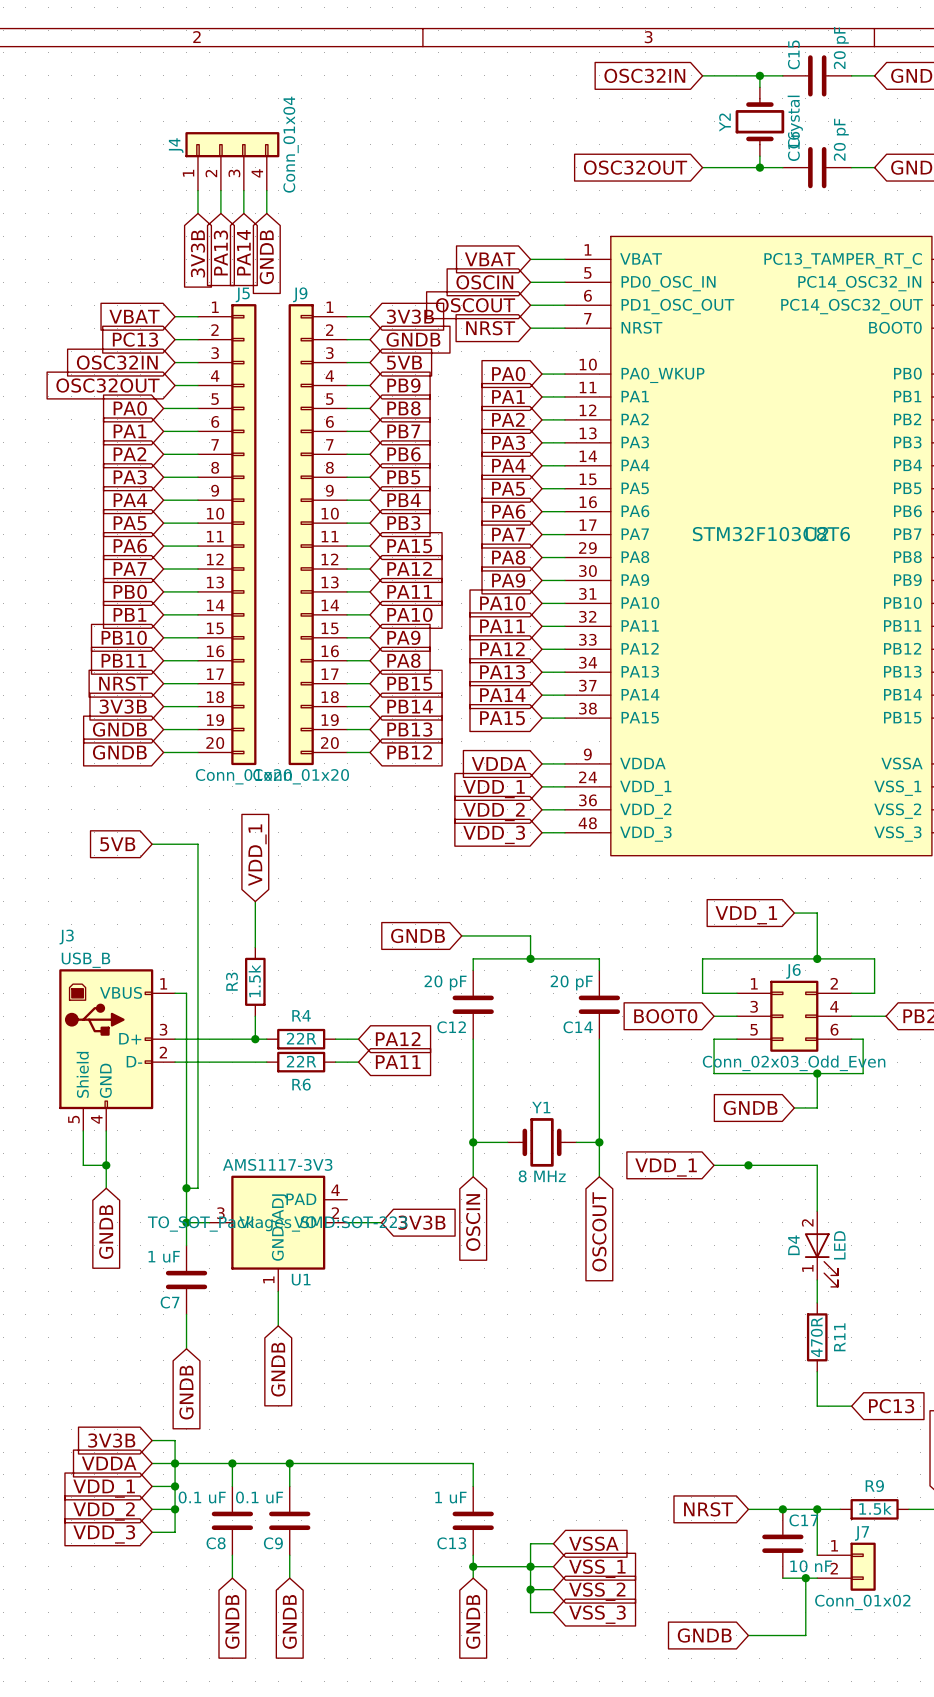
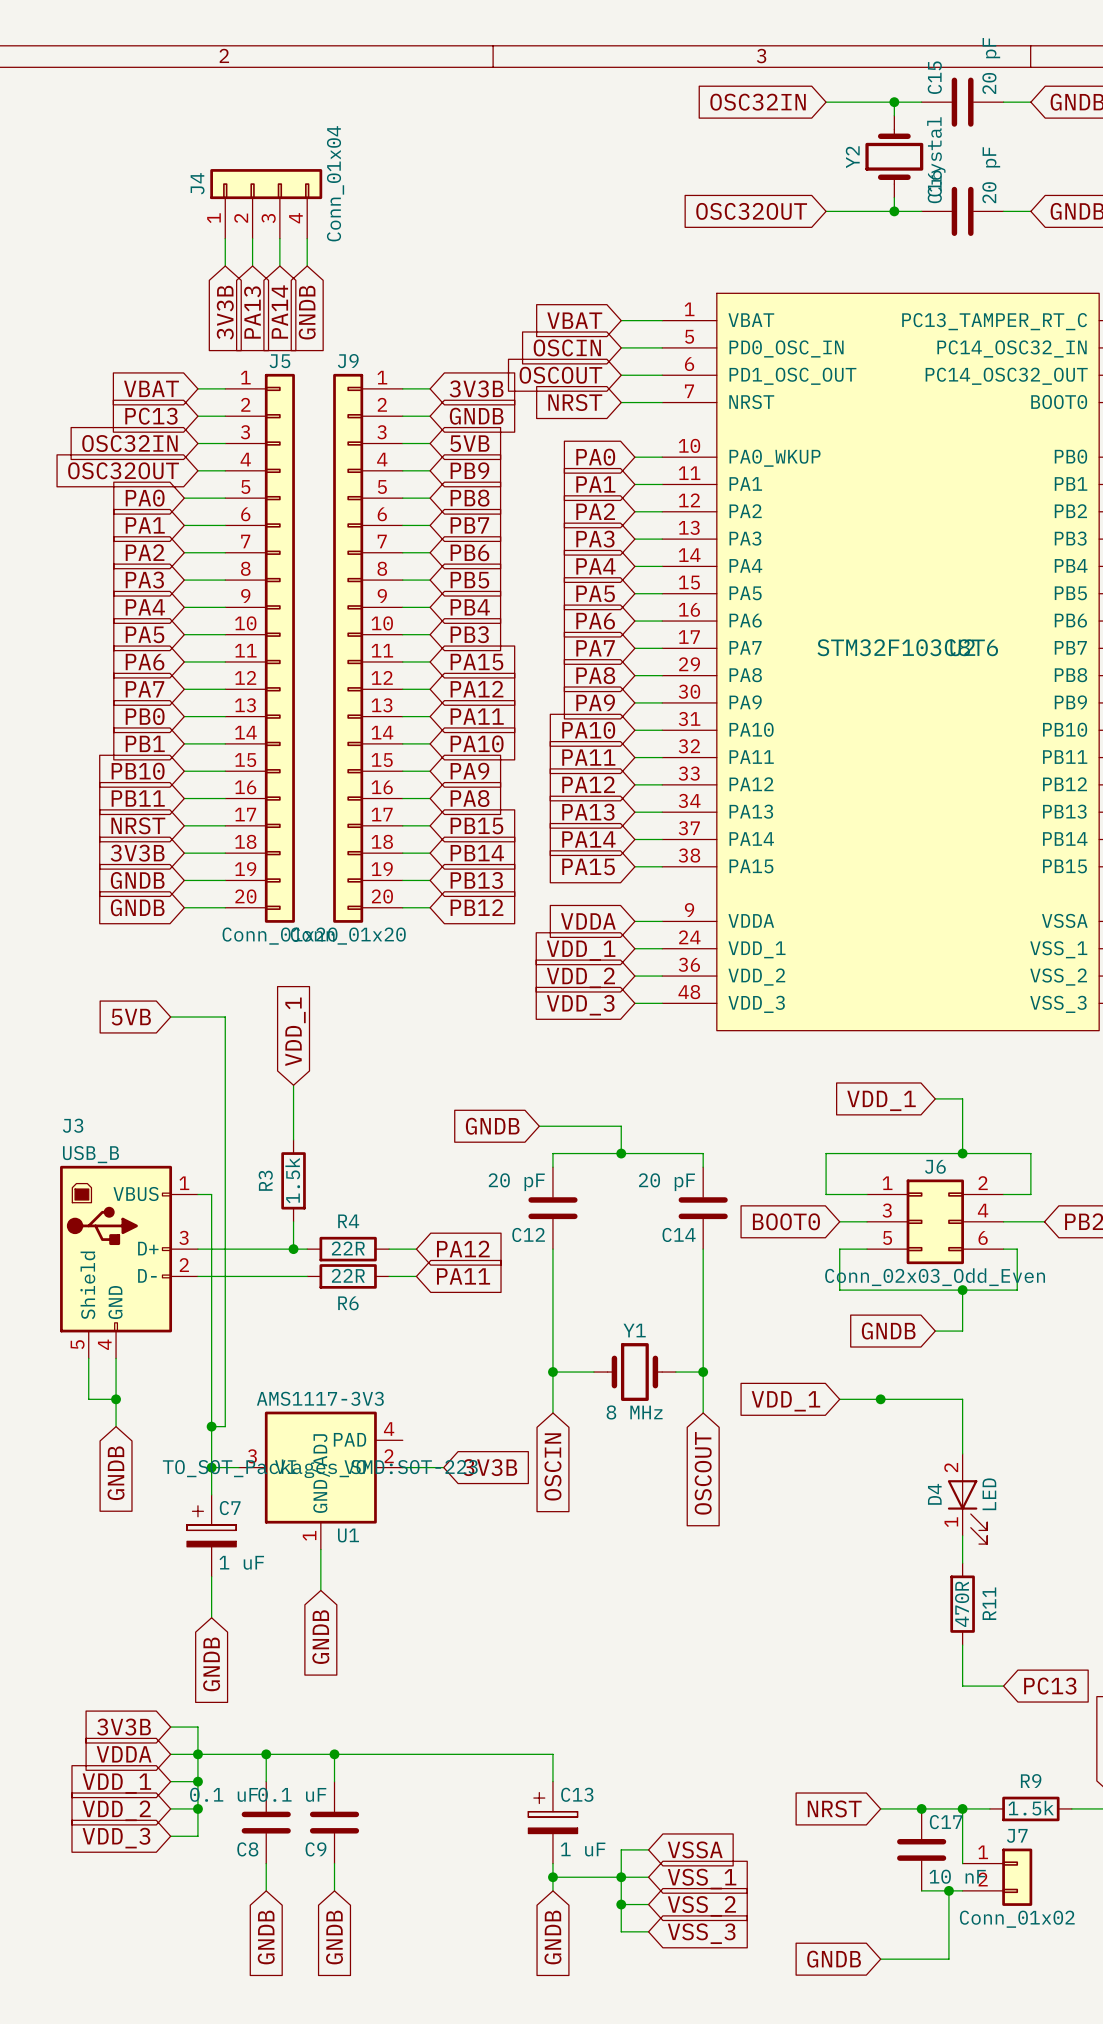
C7 symbol: [165, 1245, 208, 1315] -> [187, 1494, 237, 1577]
C7 value position: 1 uF (164, 1256) -> 1 uF (241, 1562)
C7 name position: C7 (170, 1302) -> C7 (230, 1508)
C13 symbol: [452, 1486, 494, 1556] -> [528, 1781, 578, 1864]
C13 value position: 1 uF (450, 1497) -> 1 uF (583, 1849)
C13 name position: C13 (451, 1543) -> C13 (577, 1794)

